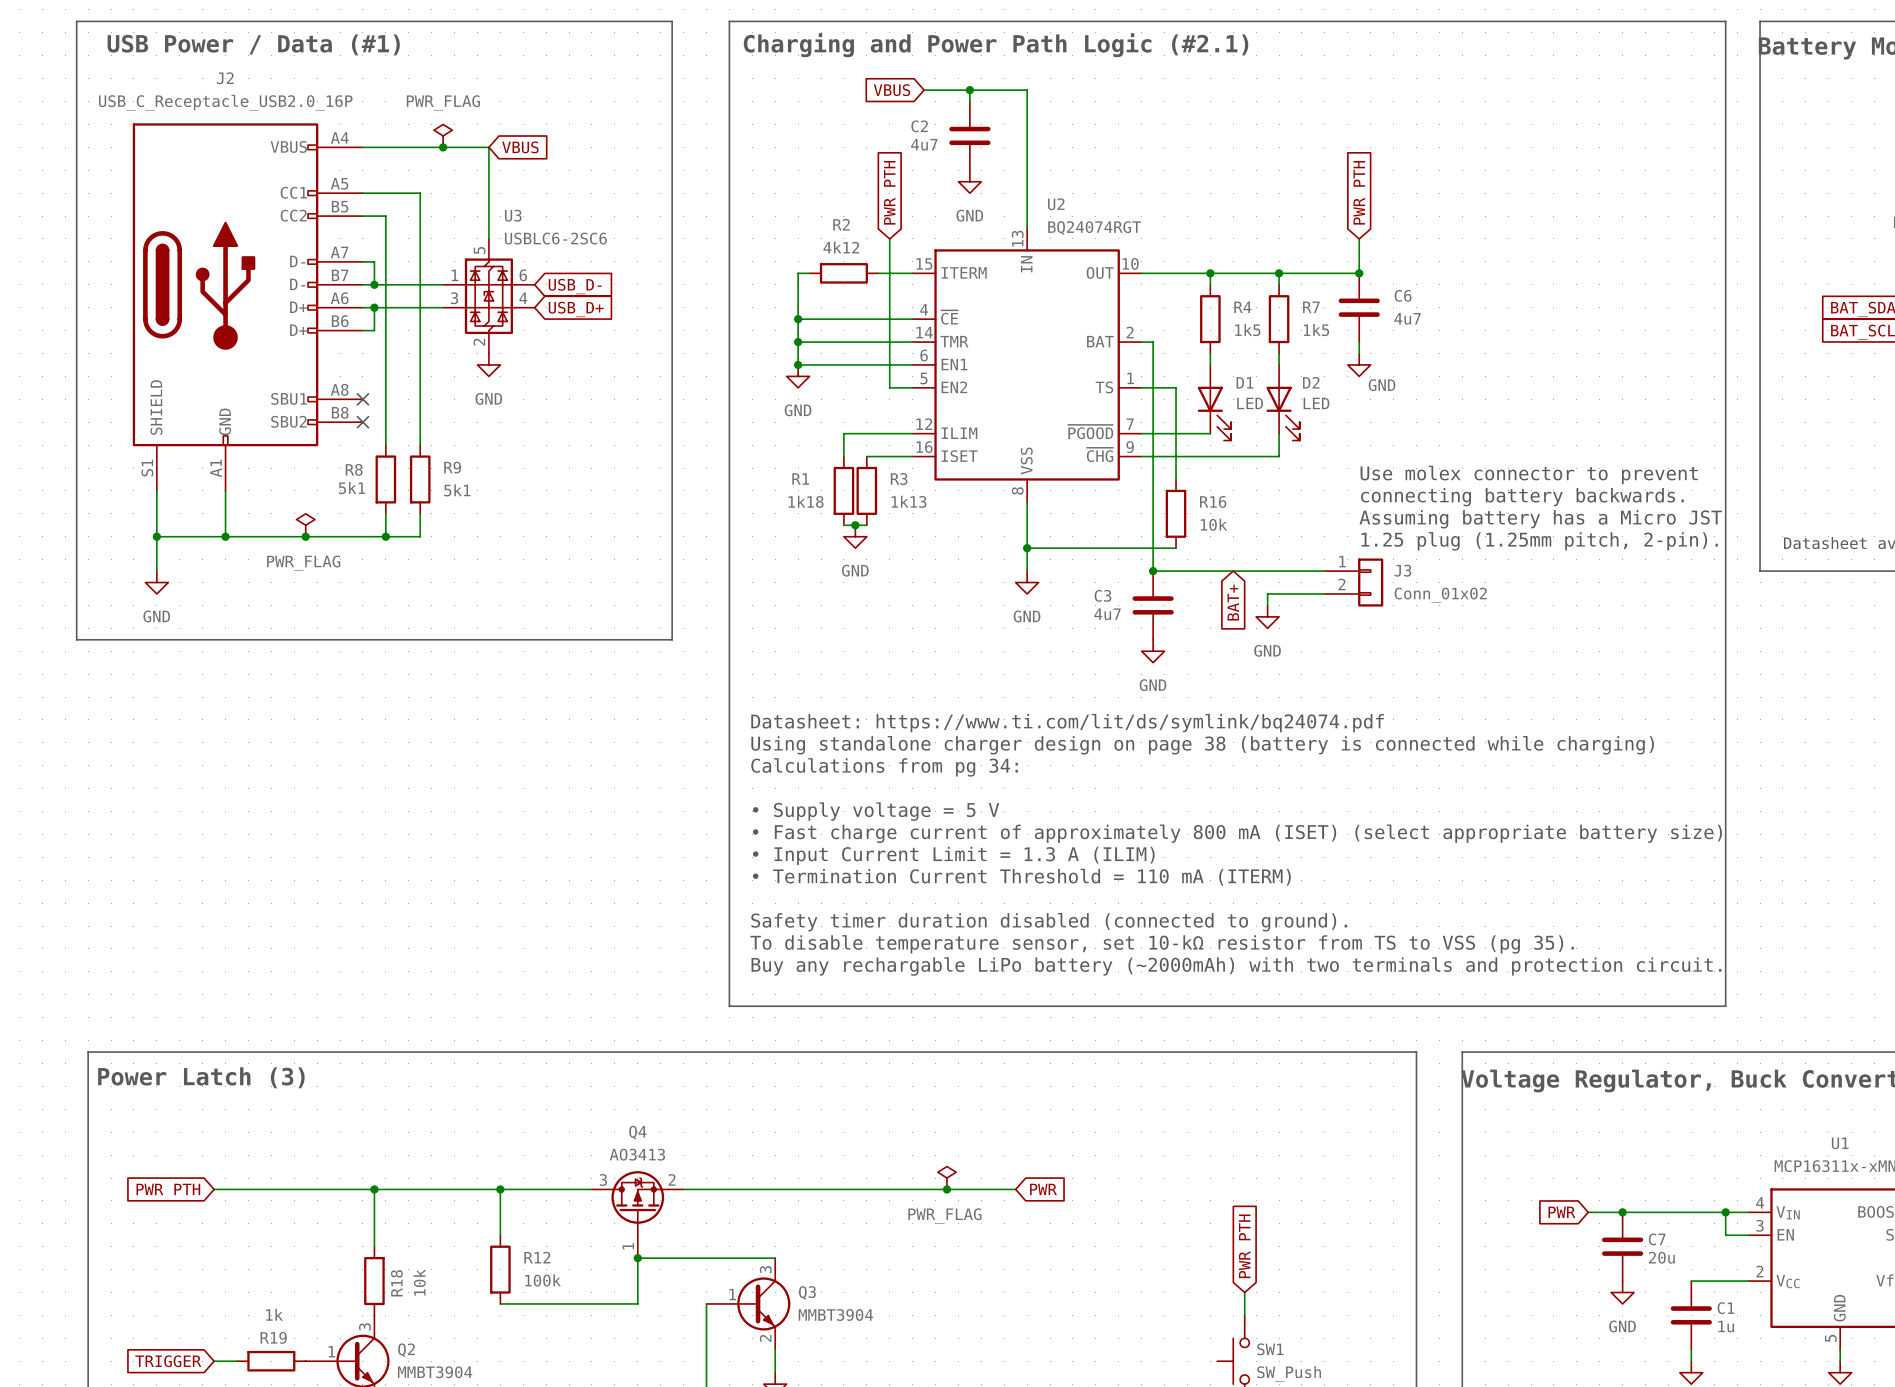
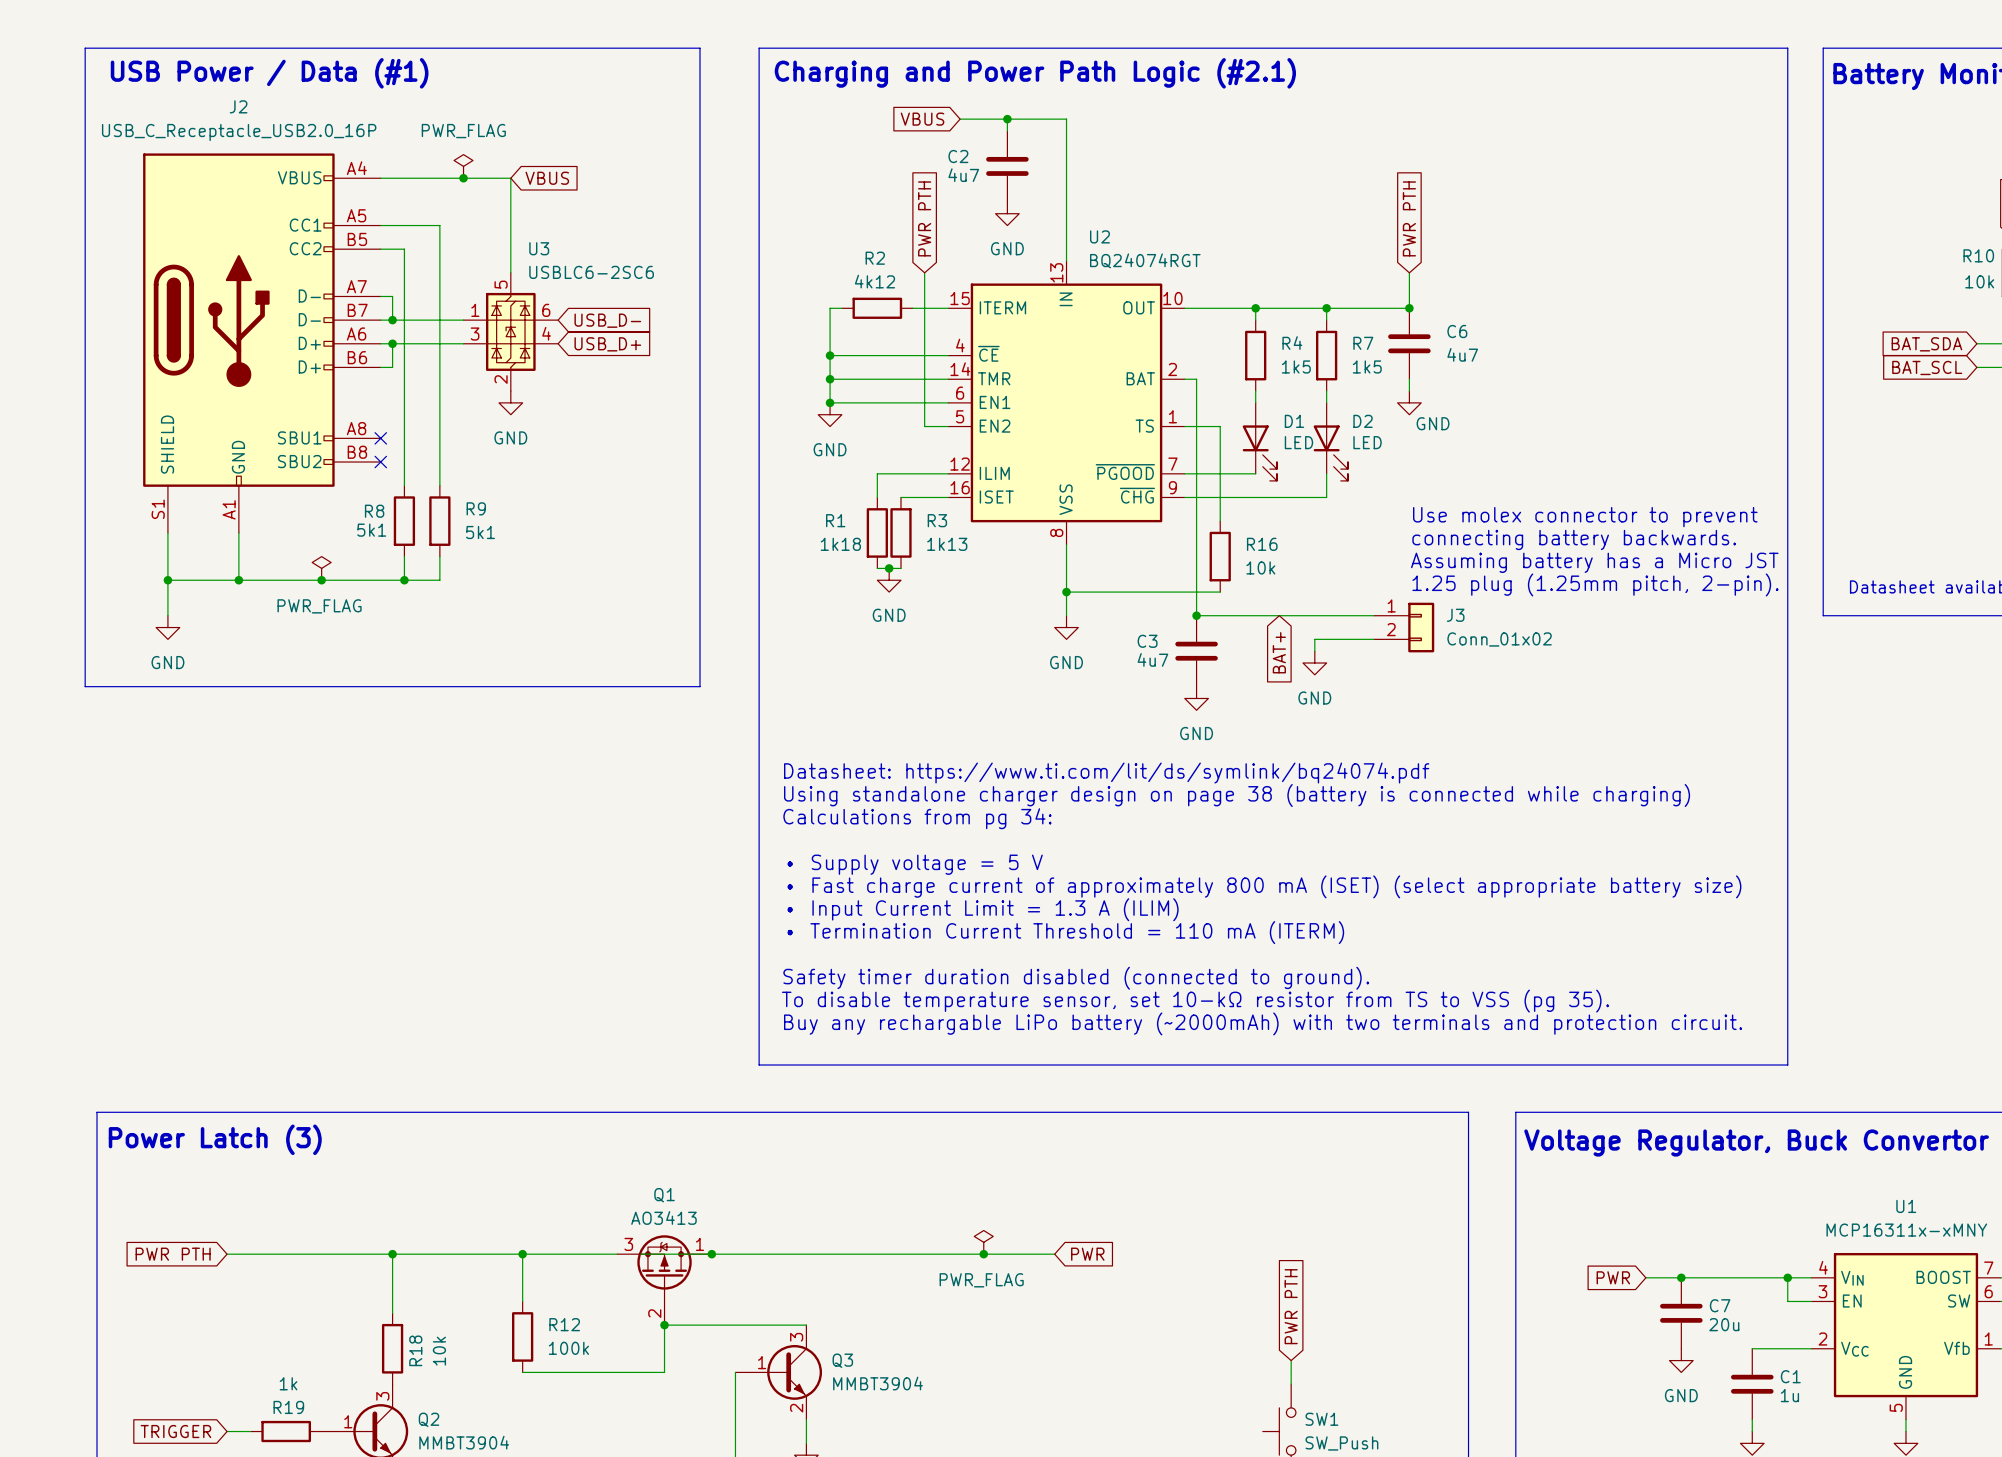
junction: none -> (711, 1254)
Q4: AO3413 (637, 1214) -> none
Q1: none -> AO3413 (664, 1280)

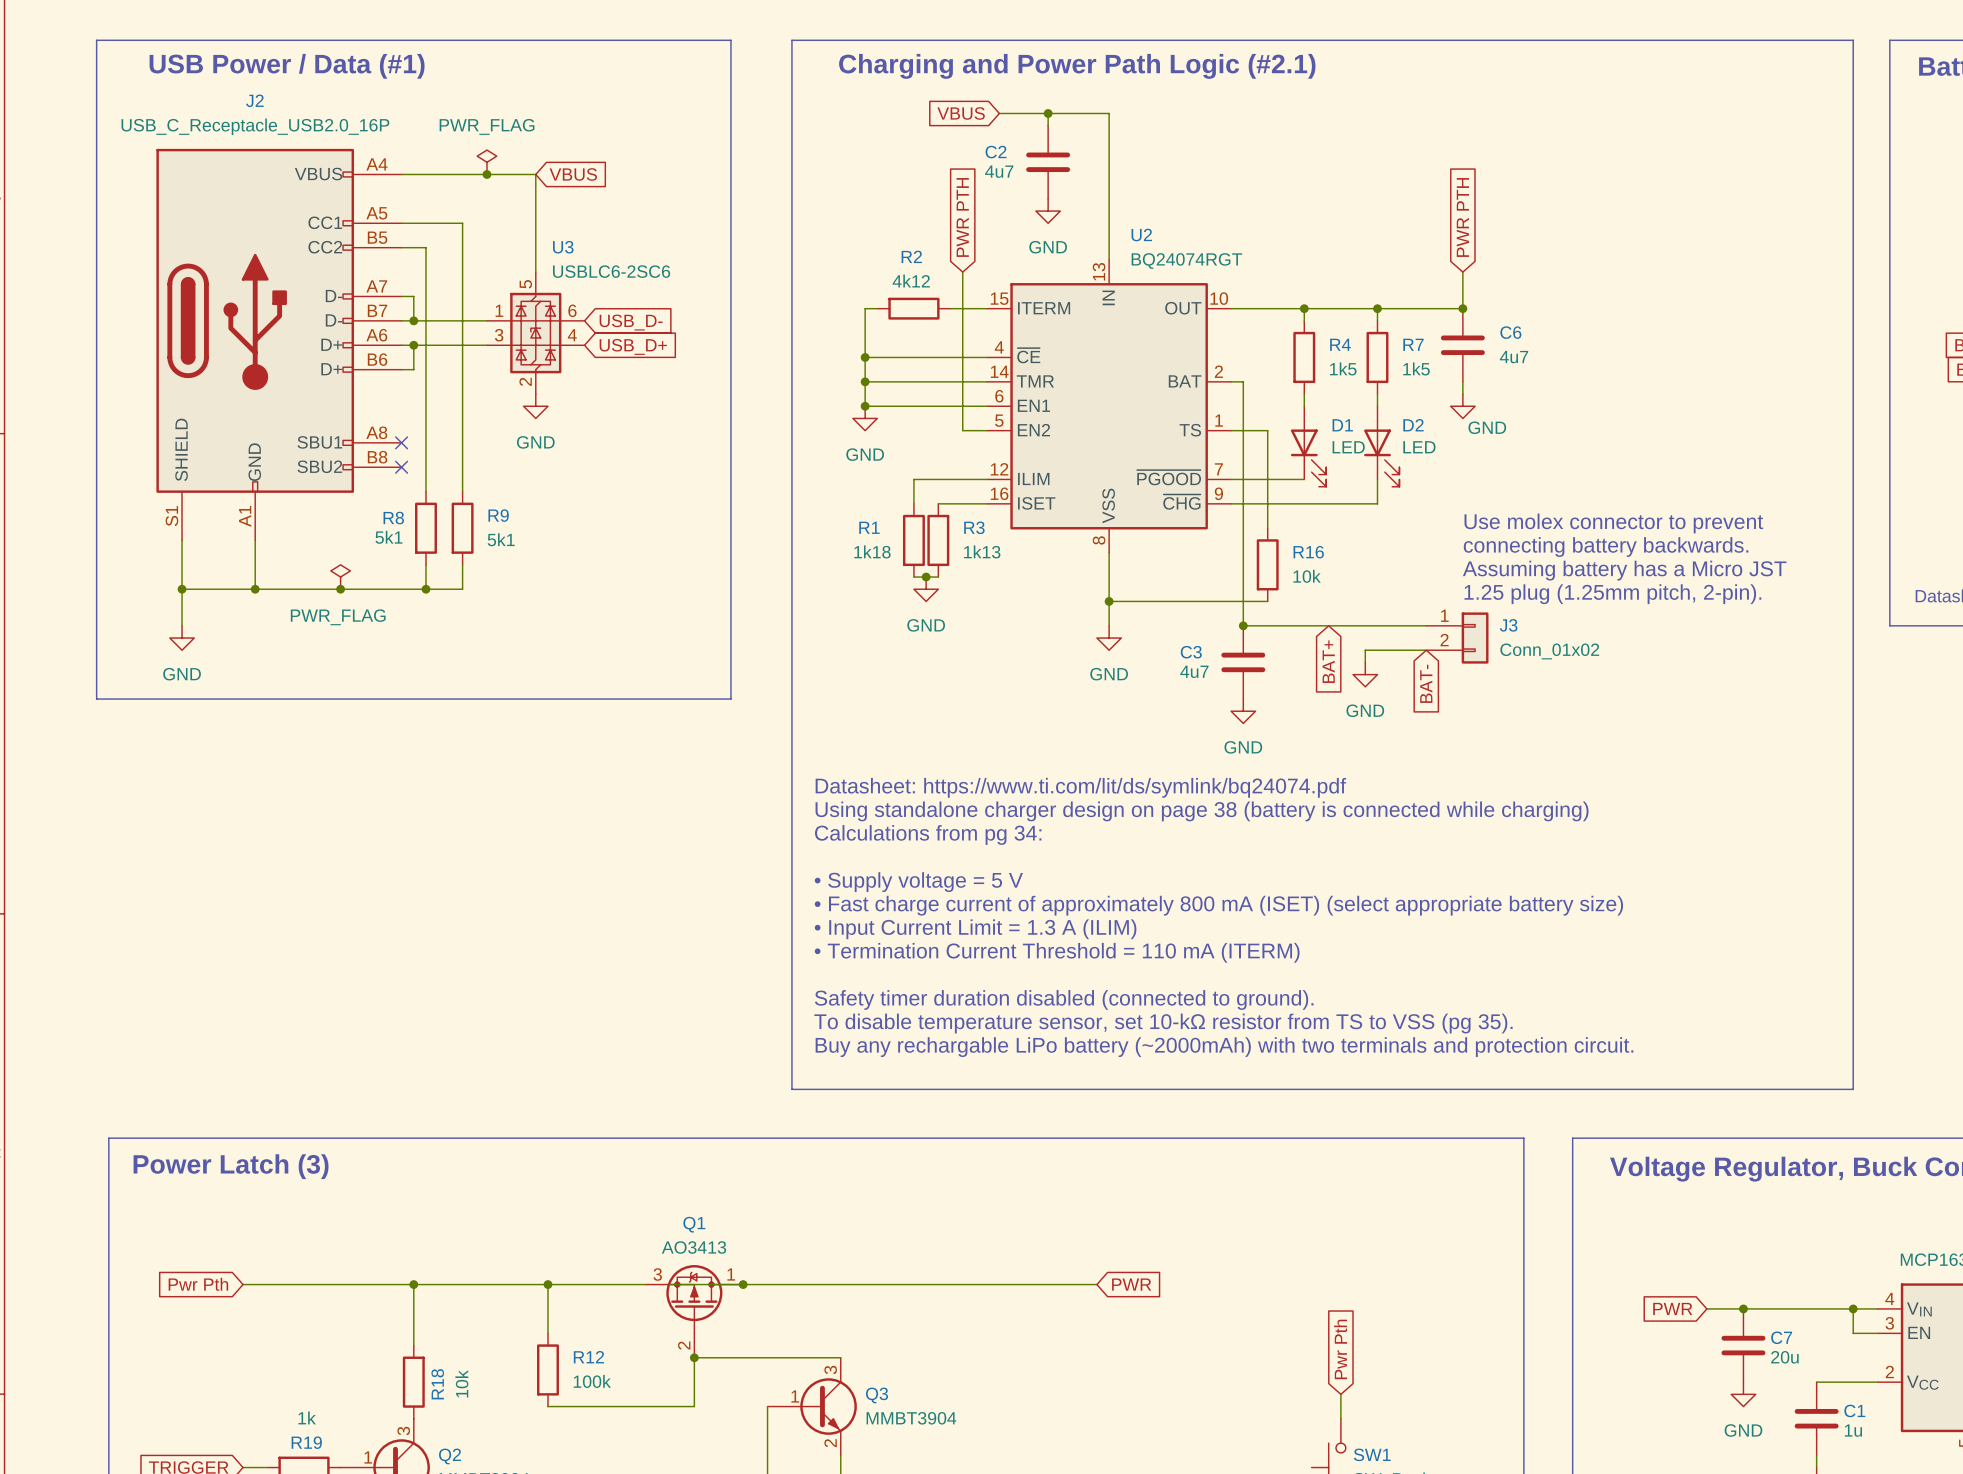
global label: none -> BAT- (1426, 683)
power symbol: PWR_FLAG (983, 1242) -> none
global label: PWR PTH (173, 1254) -> Pwr Pth (198, 1284)
junction: (983, 1254) -> none
global label: PWR PTH (1291, 1306) -> Pwr Pth (1340, 1349)

